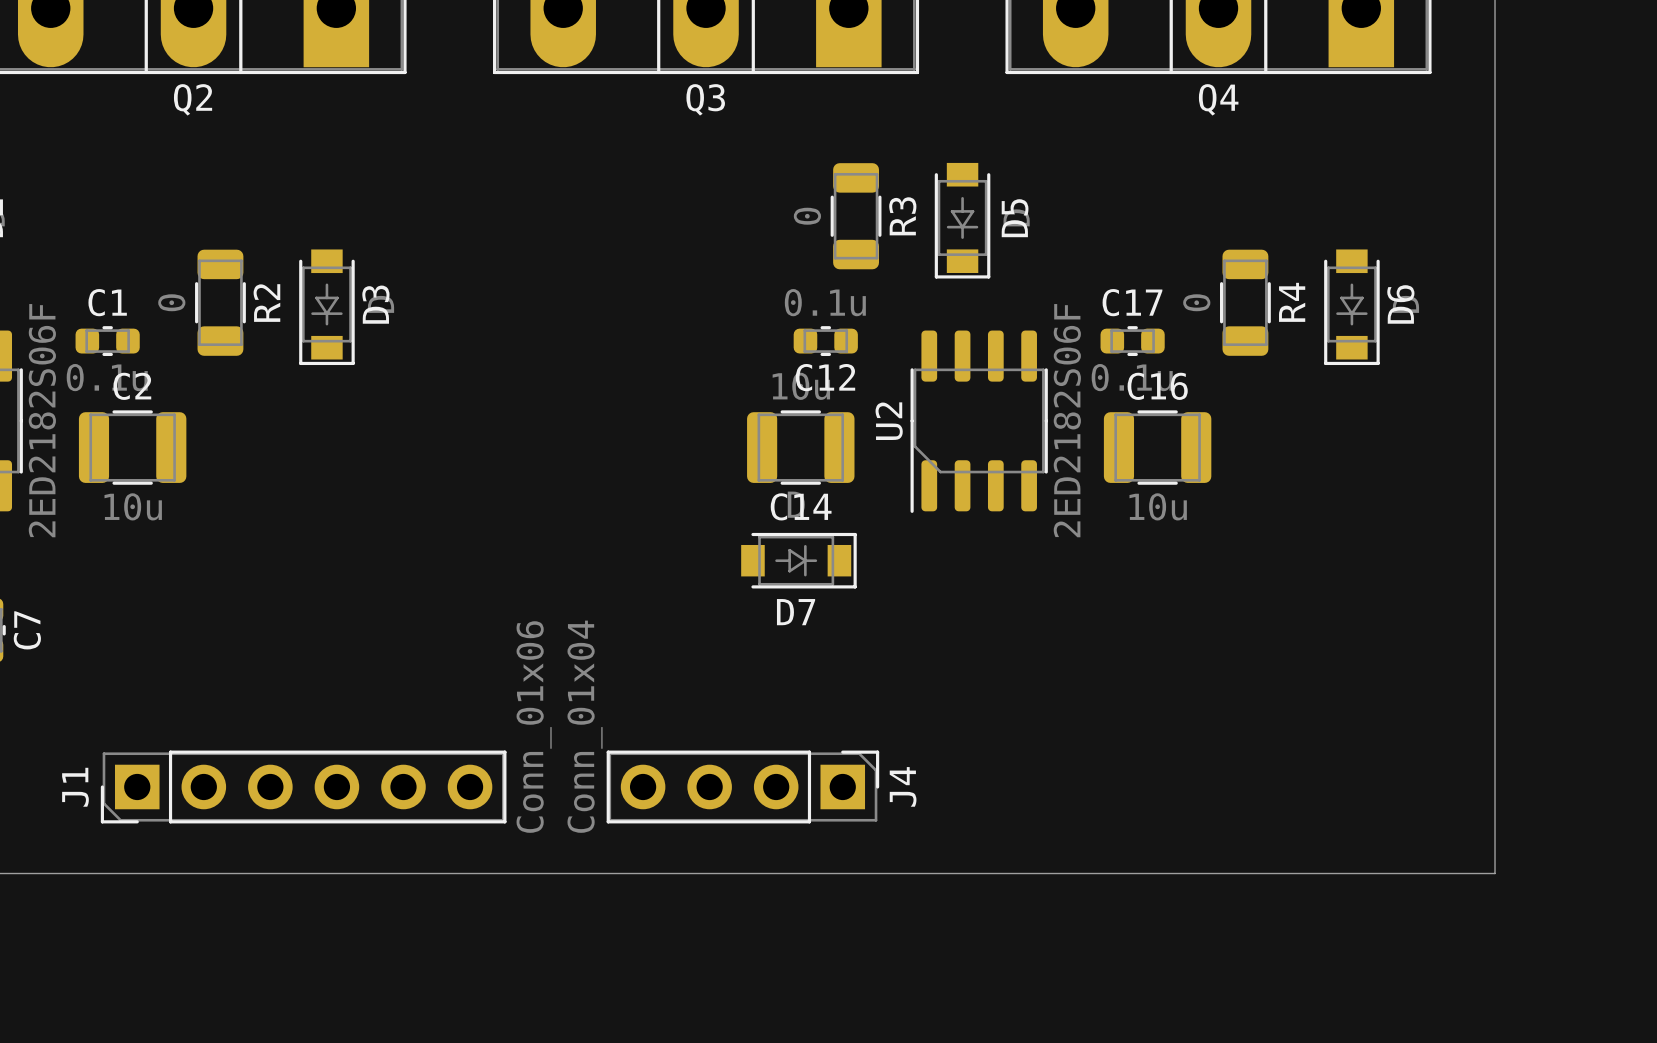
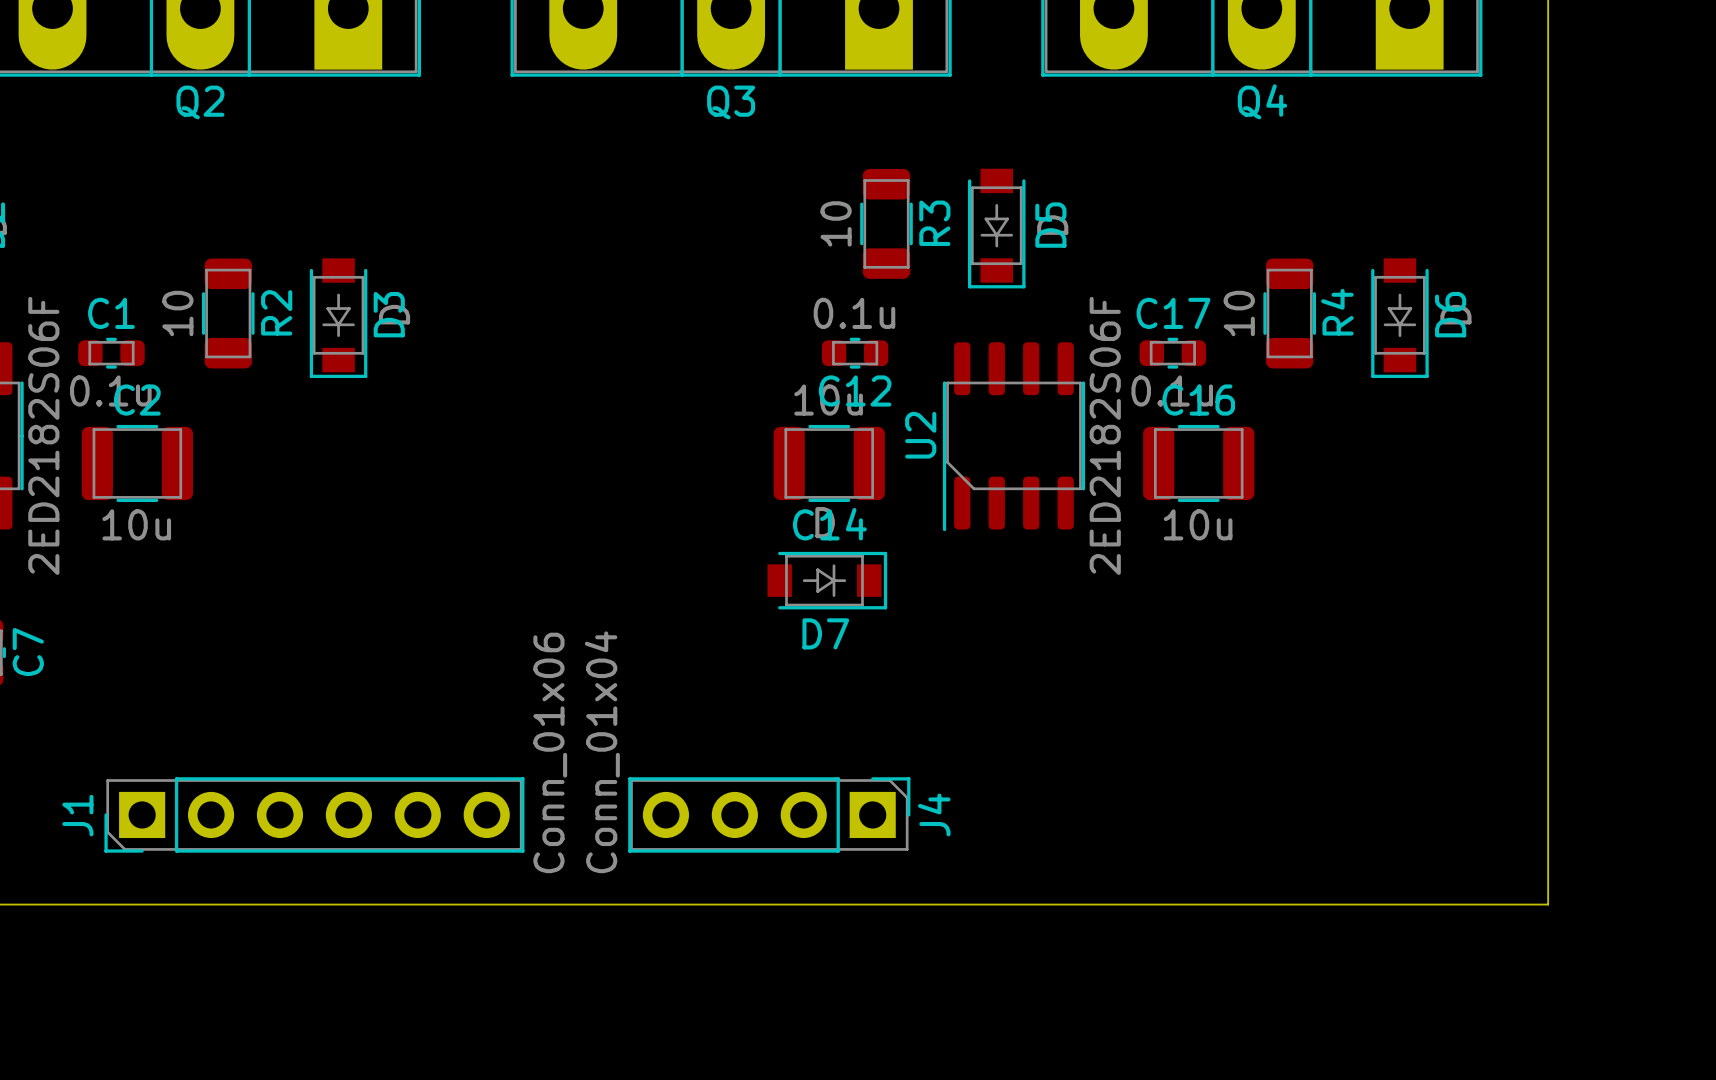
R3 value: 0 (807, 216) -> 10 (836, 223)
R2 value: 0 (171, 302) -> 10 (177, 313)
R4 value: 0 (1196, 302) -> 10 (1239, 313)

